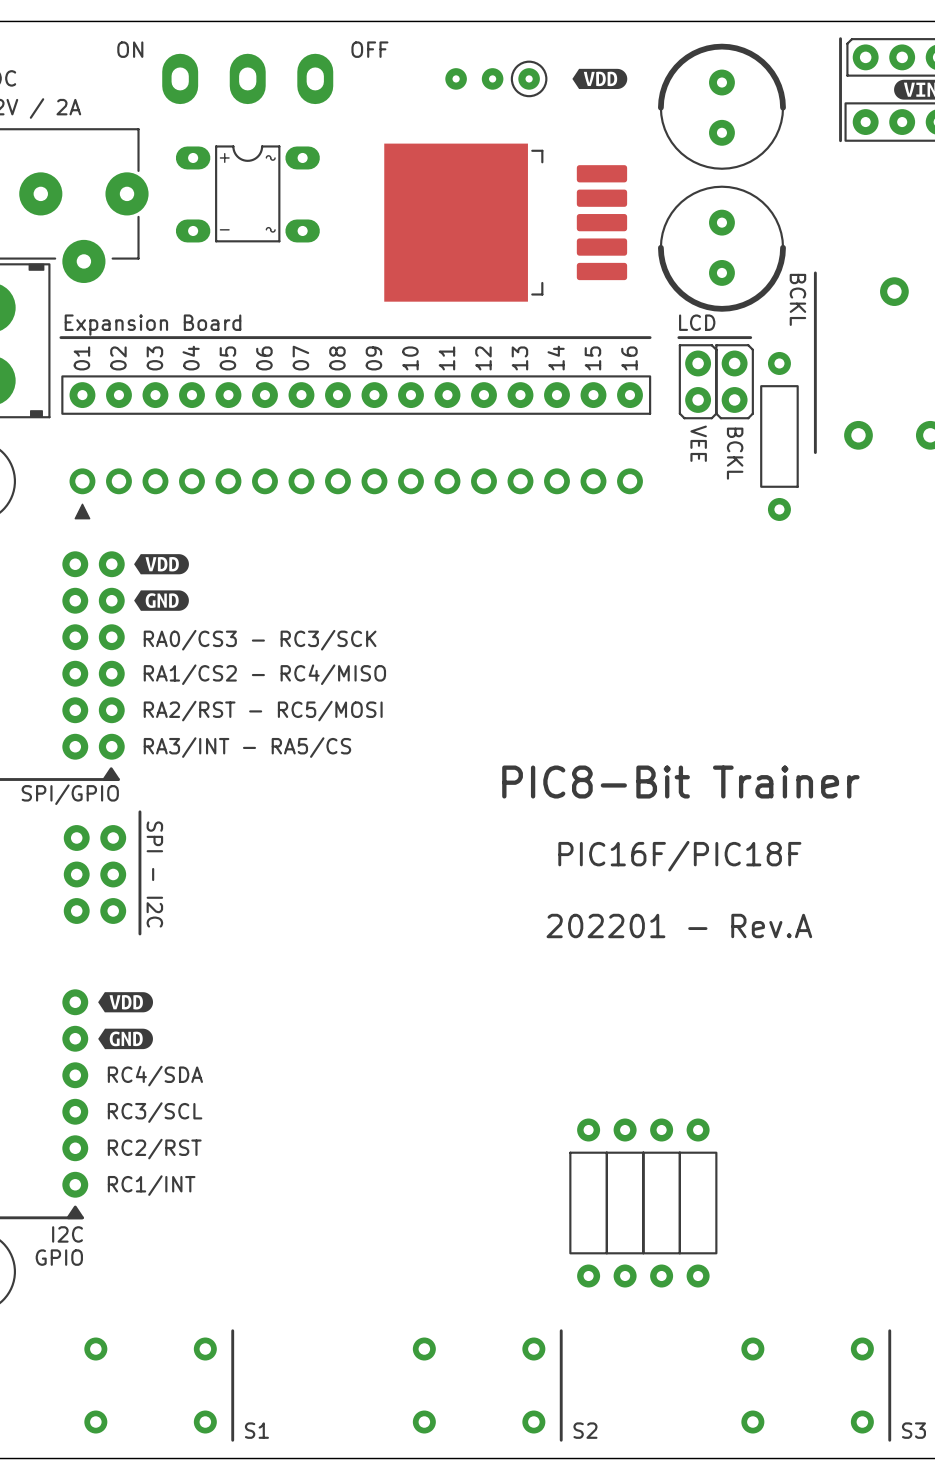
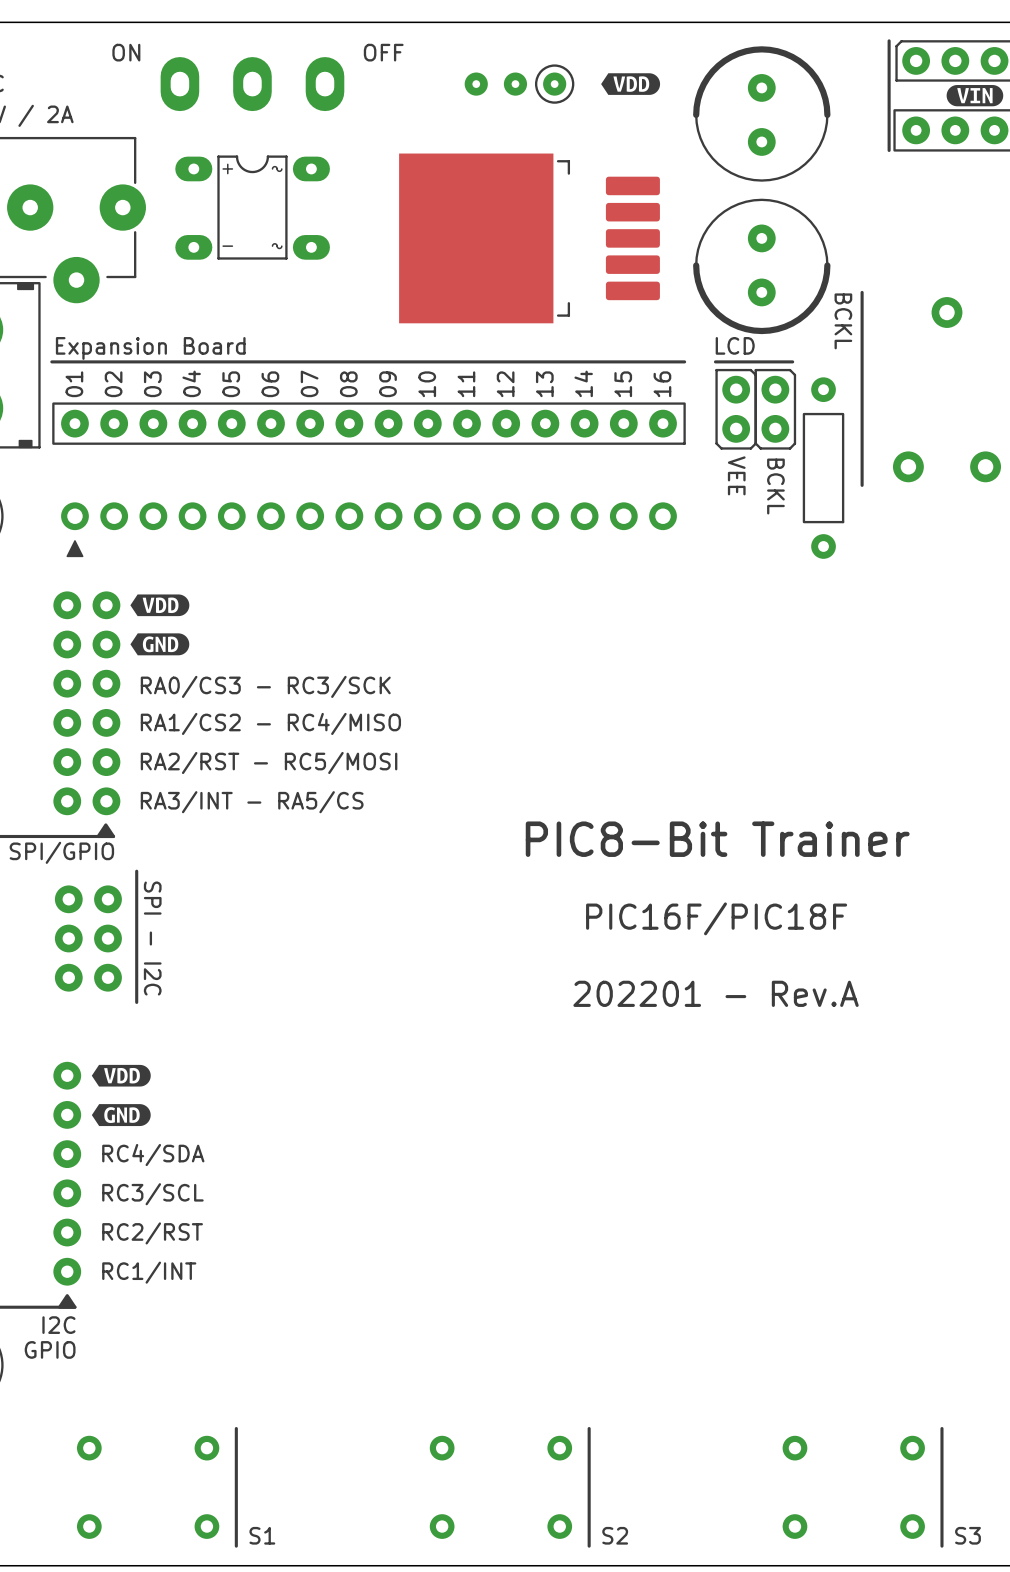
part: (588, 1203) -> none
part: (625, 1203) -> none
part: (661, 1203) -> none
part: (698, 1203) -> none

